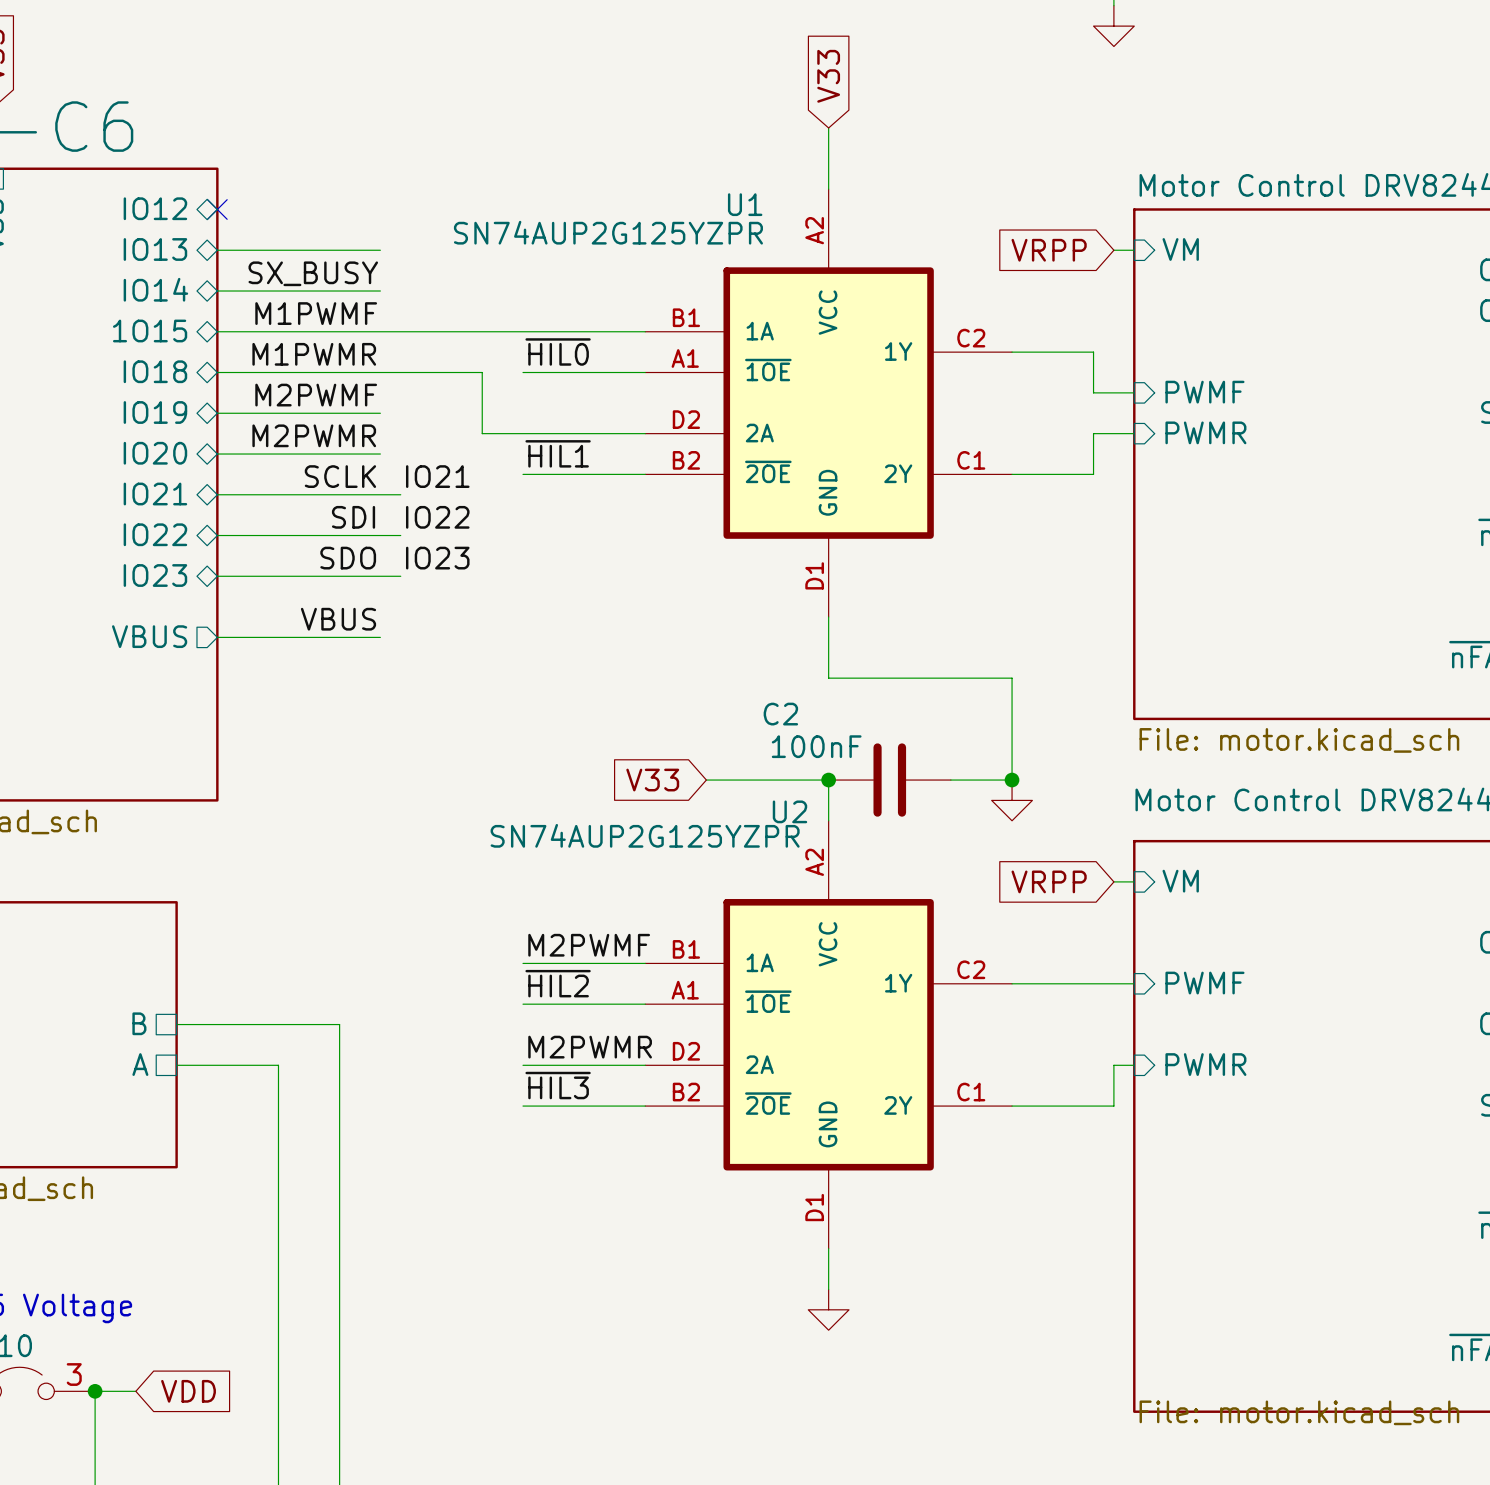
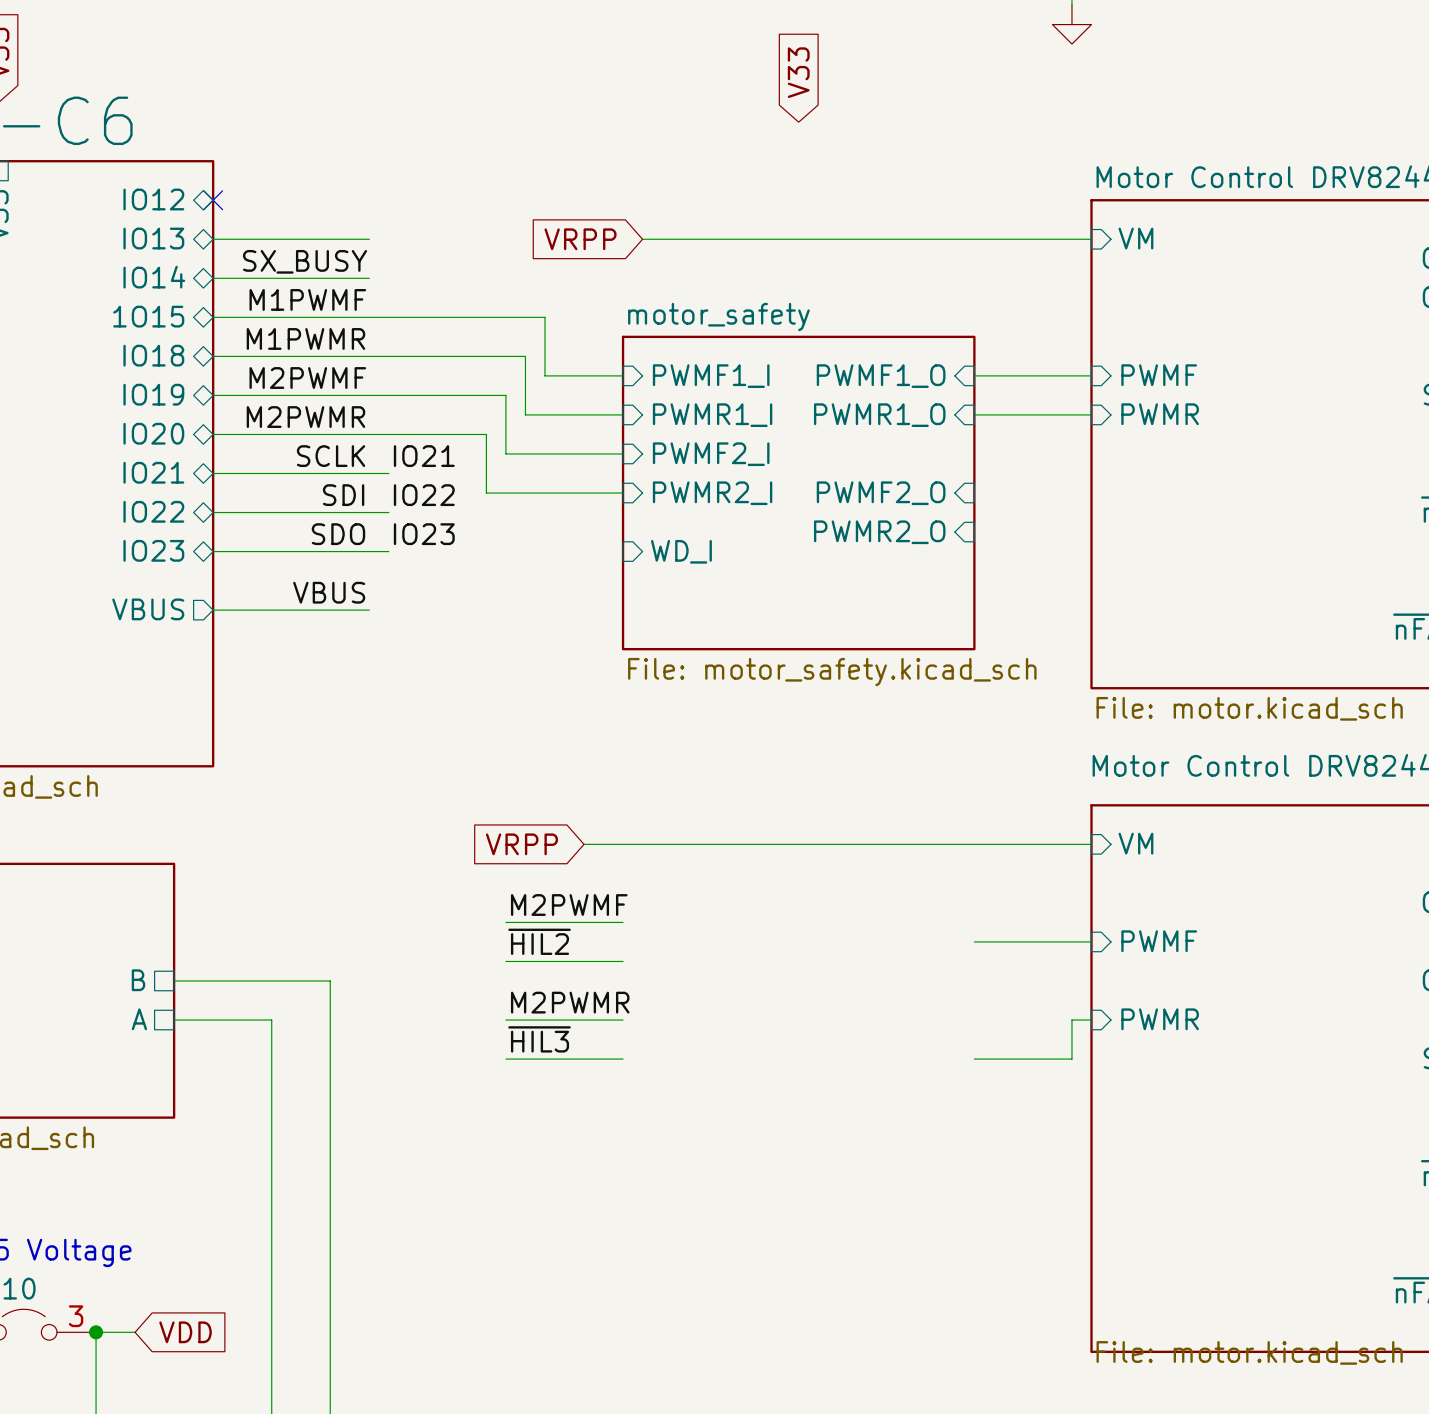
wire: (828, 127) (828, 189) -> none
global label: none -> VRPP (580, 239)
wire: none -> (642, 239) (1071, 239)
global label: VRPP (1049, 250) -> none
wire: (563, 331) (645, 331) -> (544, 317) (544, 375) (623, 375)
label: ~{HIL0} (558, 351) -> none
wire: (1012, 352) (1093, 352) (1093, 392) -> (974, 375) (1052, 375)
wire: (482, 372) (482, 433) (543, 433) -> (525, 356) (525, 414)
wire: none -> (466, 356) (505, 356)
wire: (543, 372) (645, 372) -> none
sheet pin: none -> PWMF1_I (711, 376)
sheet pin: none -> PWMF1_O (881, 376)
U1: SN74AUP2G125YZPR (828, 403) -> none
wire: none -> (369, 395) (505, 395) (505, 453)
sheet pin: none -> PWMR1_I (712, 415)
sheet pin: none -> PWMR1_O (879, 415)
wire: (1093, 433) (1093, 474) (1012, 474) -> (1052, 414) (974, 414)
label: ~{HIL1} (558, 453) -> none
wire: none -> (369, 434) (486, 434) (486, 493) (623, 493)
sheet pin: none -> PWMF2_I (711, 454)
sheet pin: none -> PWMR2_I (712, 493)
sheet motor_safety: none -> File: motor_safety.kicad_sch (798, 493)
sheet pin: none -> PWMF2_O (881, 493)
sheet pin: none -> PWMR2_O (879, 532)
sheet pin: none -> WD_I (681, 551)
wire: (828, 617) (828, 678) (1012, 678) (1012, 780) (950, 780) -> none
global label: V33 (652, 780) -> none
wire: (706, 780) (828, 780) (828, 820) -> none
junction: (828, 780) -> none
C2: 100nF (889, 780) -> none
junction: (1012, 780) -> none
power symbol: (1012, 800) -> none
global label: none -> VRPP (521, 844)
wire: none -> (584, 844) (1071, 844)
global label: VRPP (1049, 881) -> none
U2: SN74AUP2G125YZPR (828, 1034) -> none
wire: (828, 1248) (828, 1289) -> none
power symbol: (828, 1309) -> none

